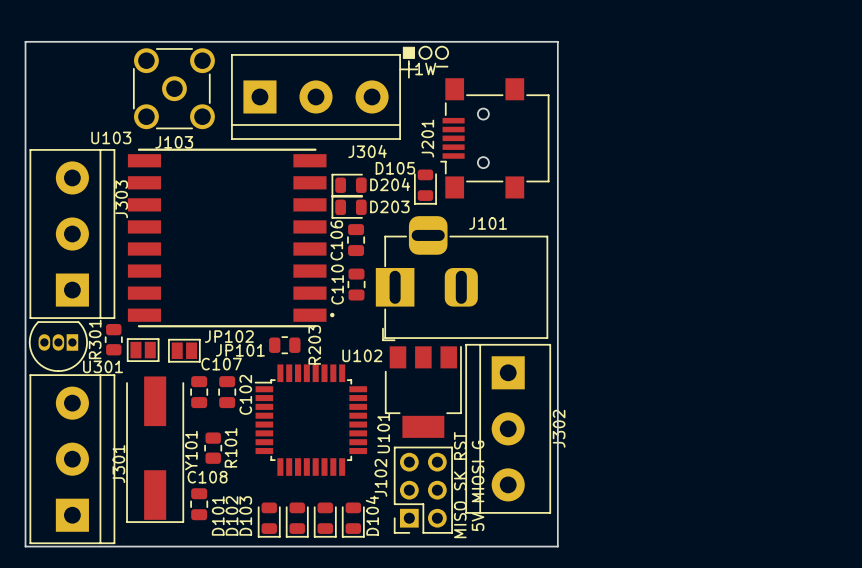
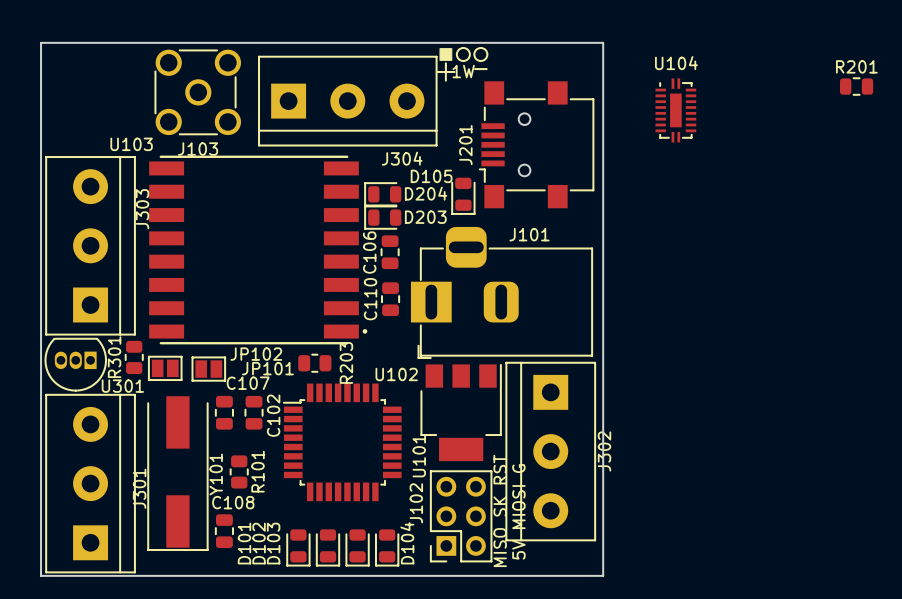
R201: none -> (856, 86)
U104: none -> (675, 110)

